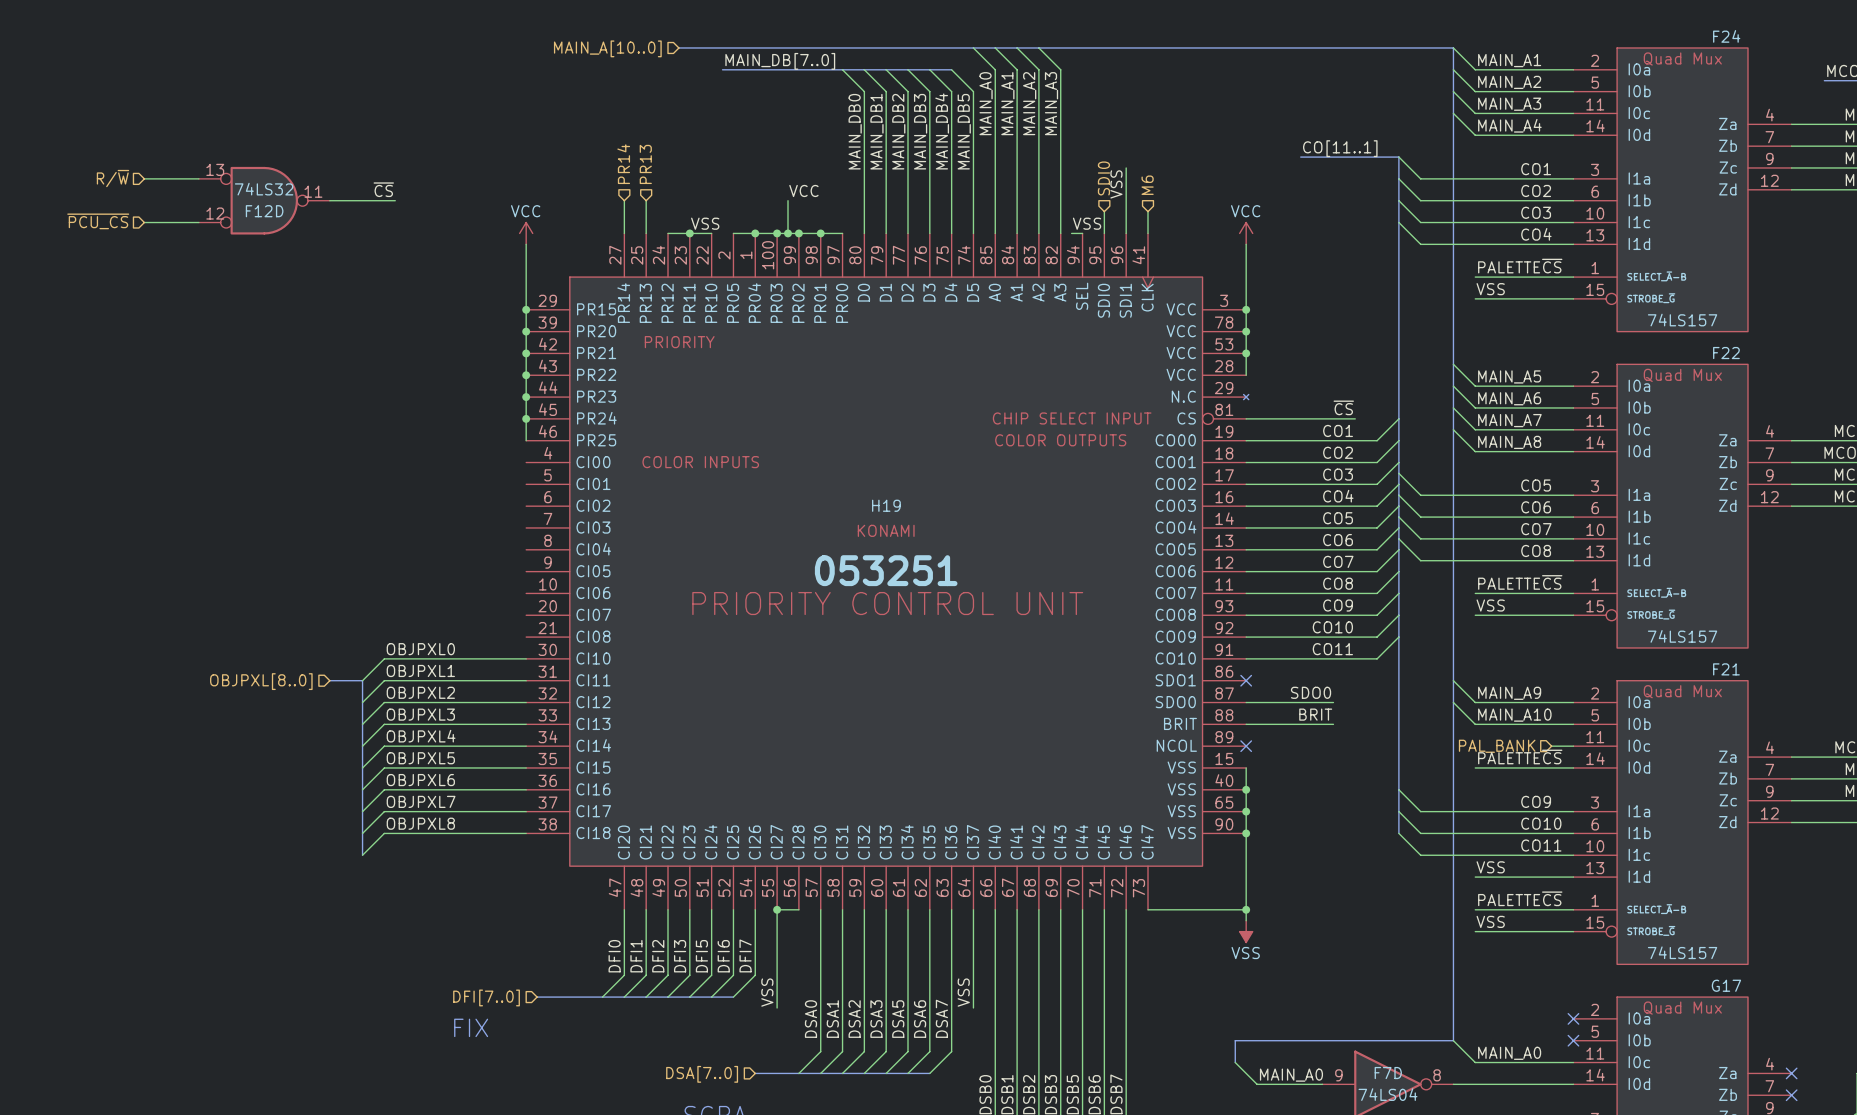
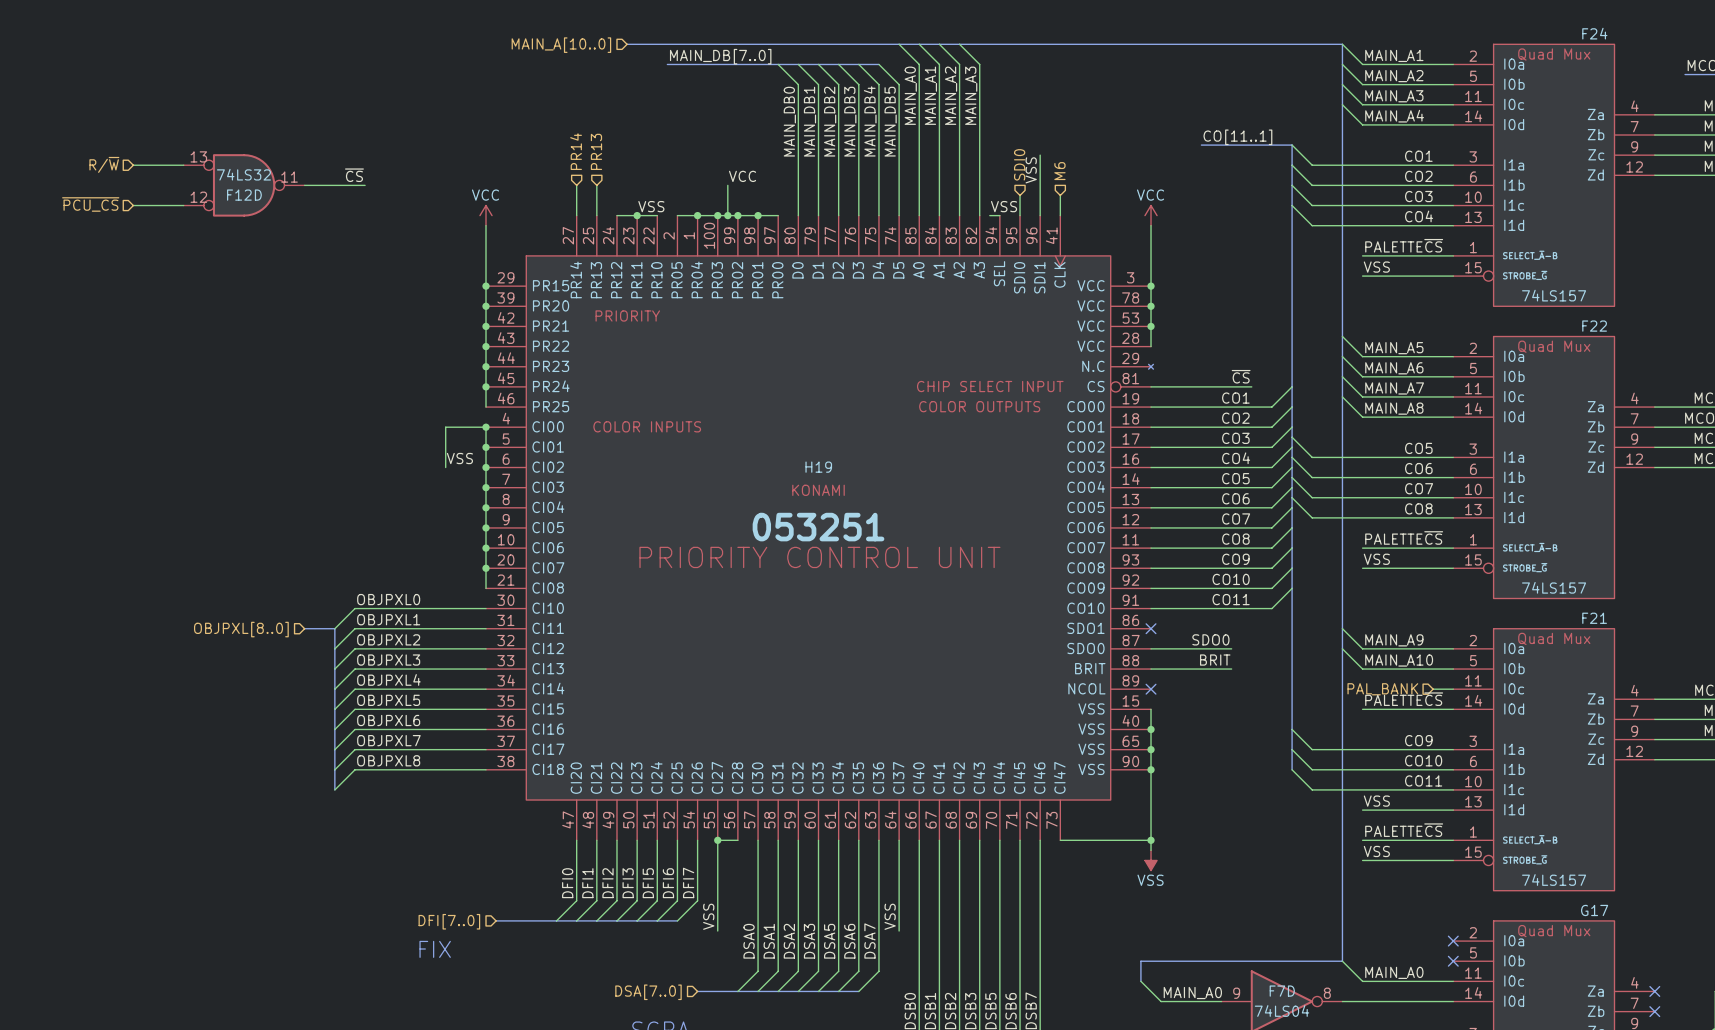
junction: none -> (486, 427)
junction: none -> (486, 447)
label: none -> VSS (459, 458)
wire: none -> (445, 467) (445, 427) (486, 427) (486, 588)
junction: none -> (486, 467)
junction: none -> (486, 487)
junction: none -> (486, 507)
junction: none -> (486, 527)
junction: none -> (486, 548)
junction: none -> (486, 568)

